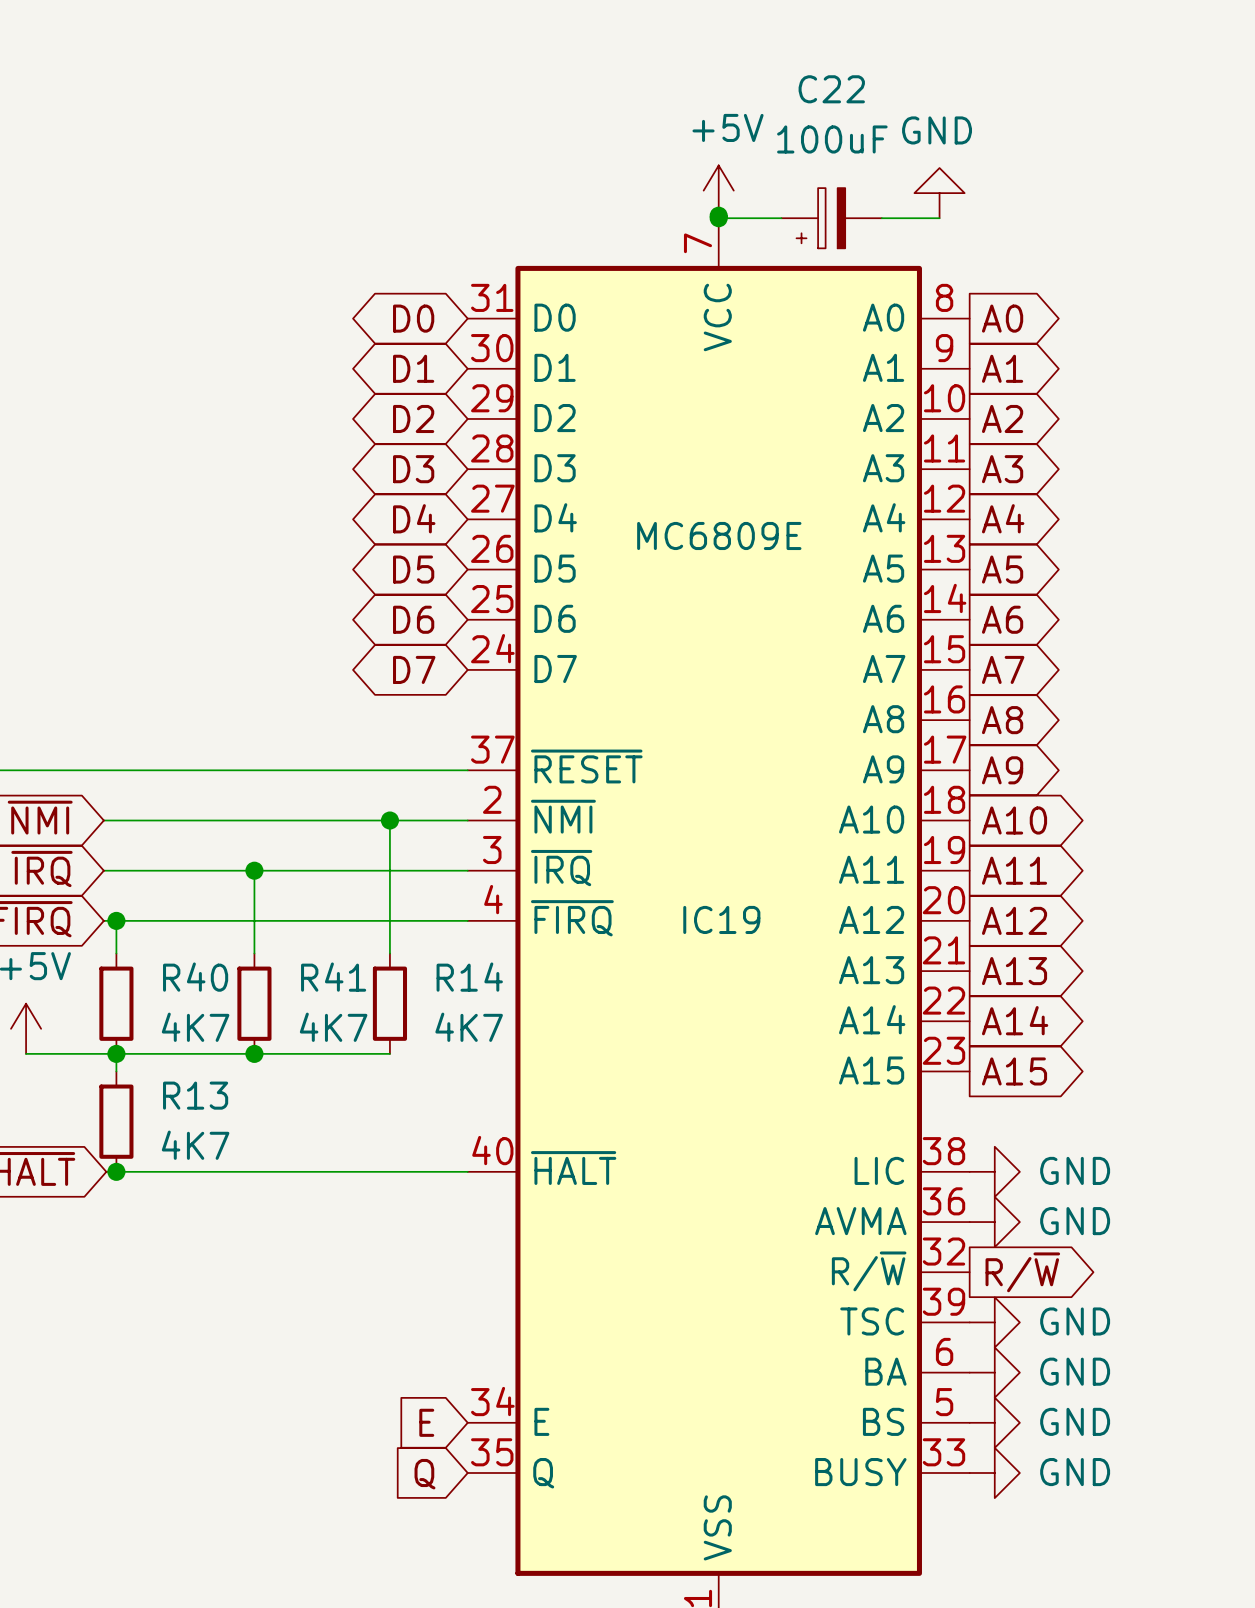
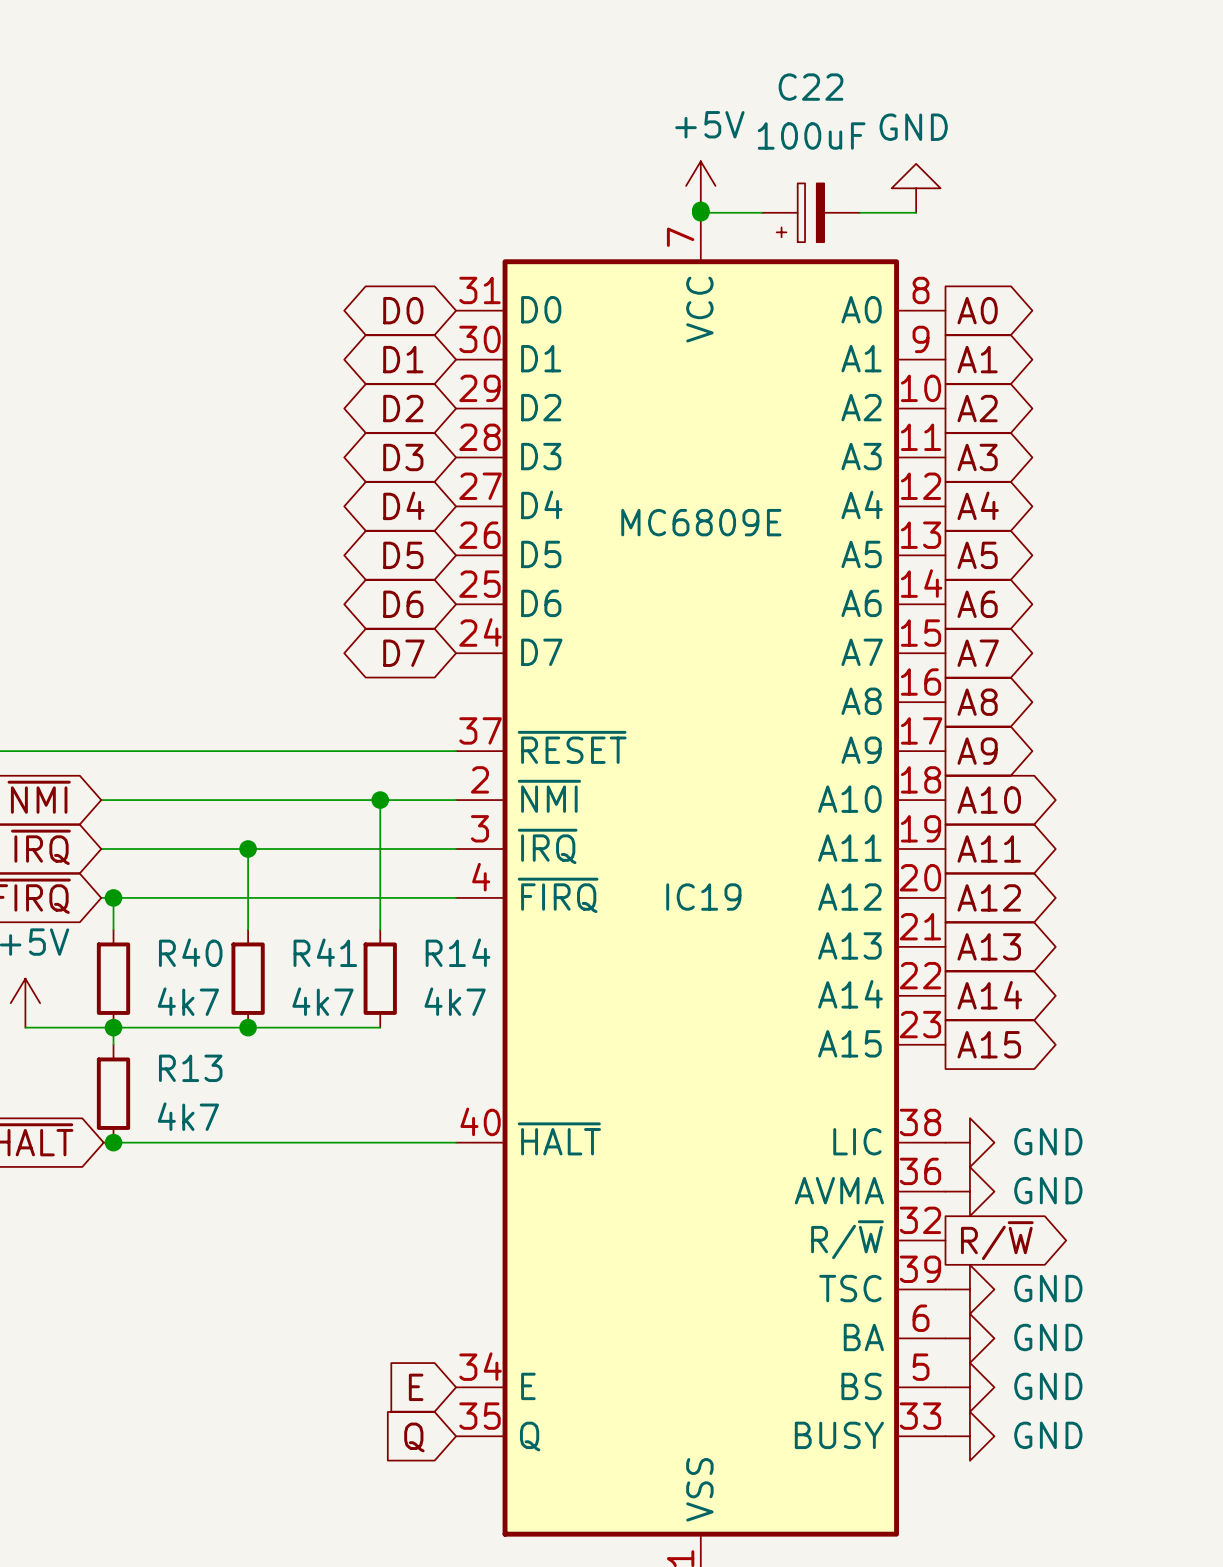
R40 value: 4K7 (195, 1027) -> 4k7 (188, 1001)
R41 value: 4K7 (333, 1027) -> 4k7 (322, 1001)
R14 value: 4K7 (469, 1027) -> 4k7 (455, 1001)
R13 value: 4K7 (195, 1145) -> 4k7 (188, 1116)

